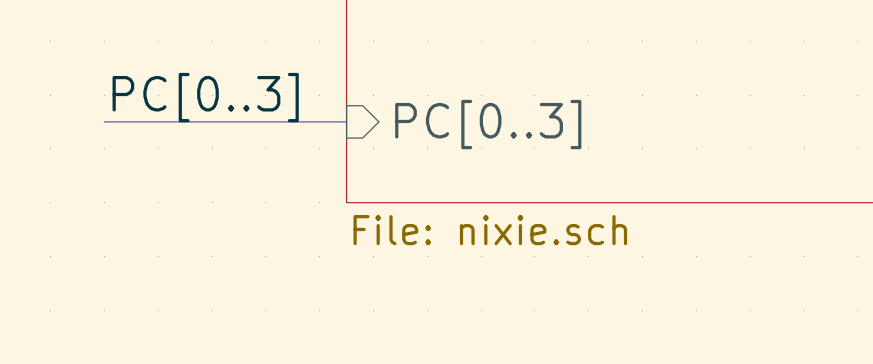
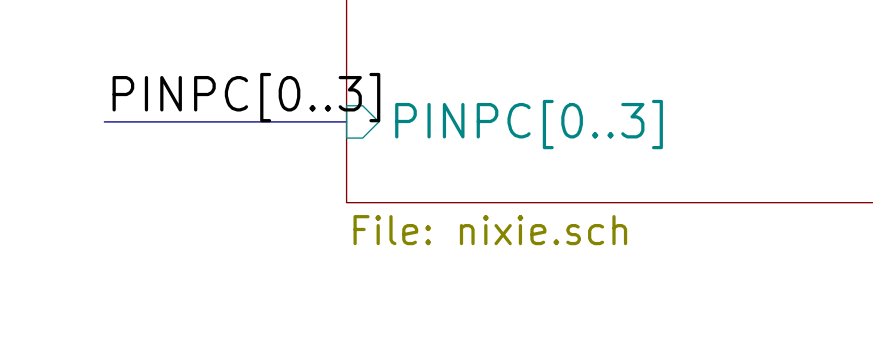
label: PC[0..3] (205, 97) -> PINPC[0..3] (246, 97)
sheet pin: PC[0..3] (488, 124) -> PINPC[0..3] (529, 124)

